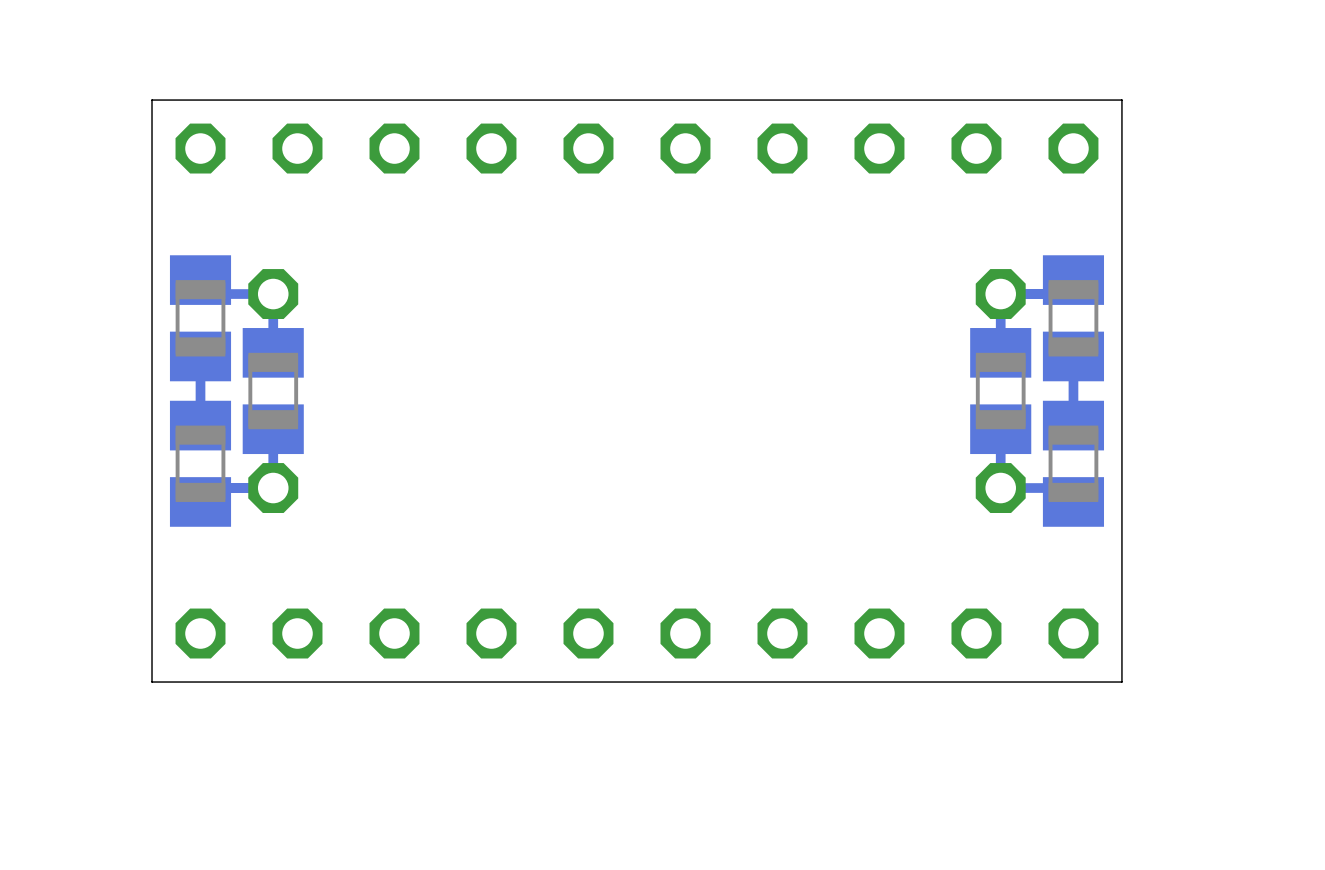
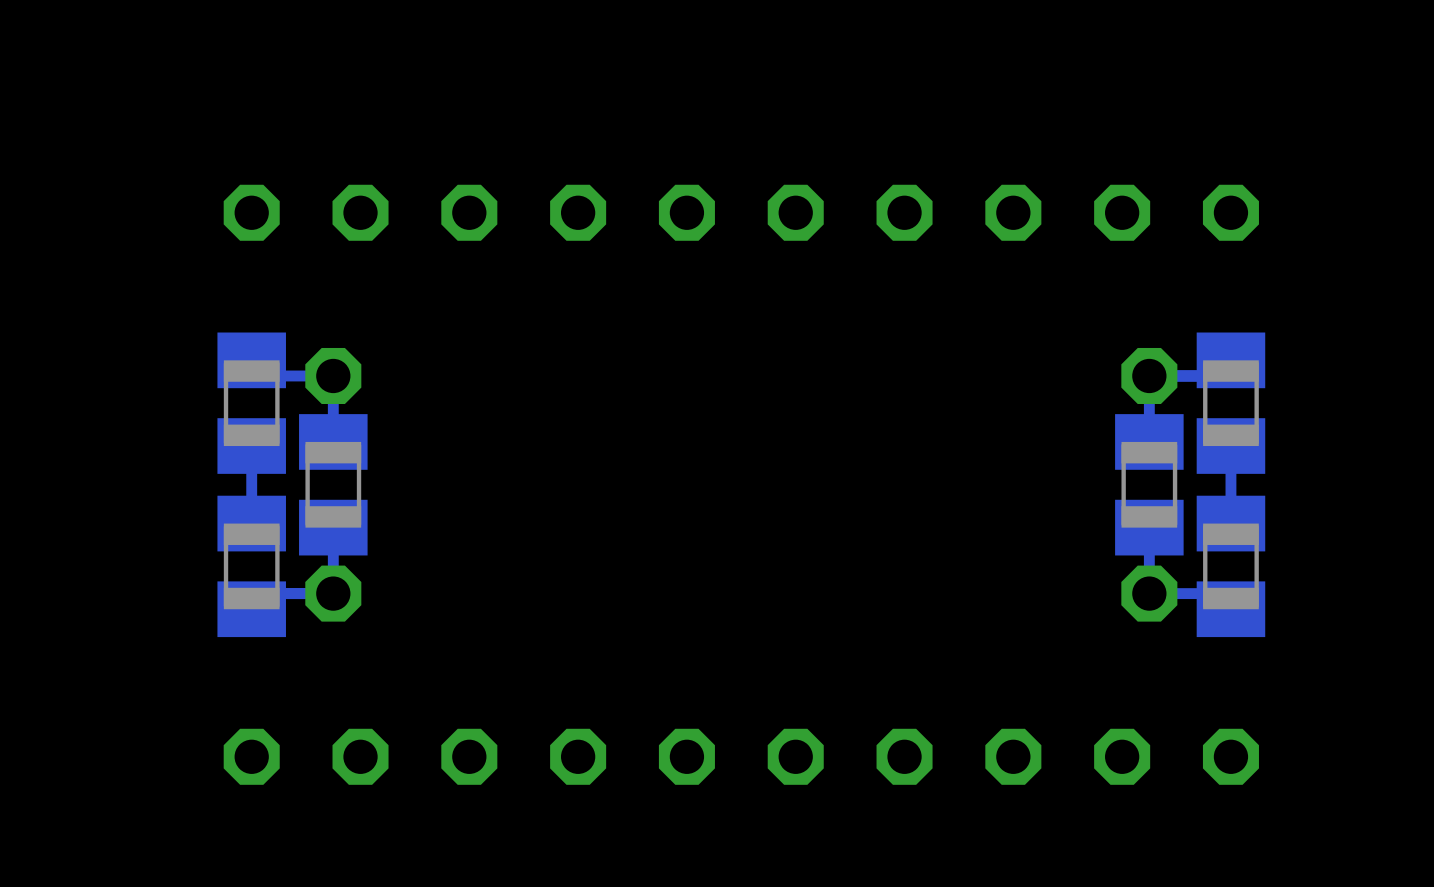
board edge: (1121, 100) (152, 100) (152, 682) (1121, 682) (1121, 100) -> none

